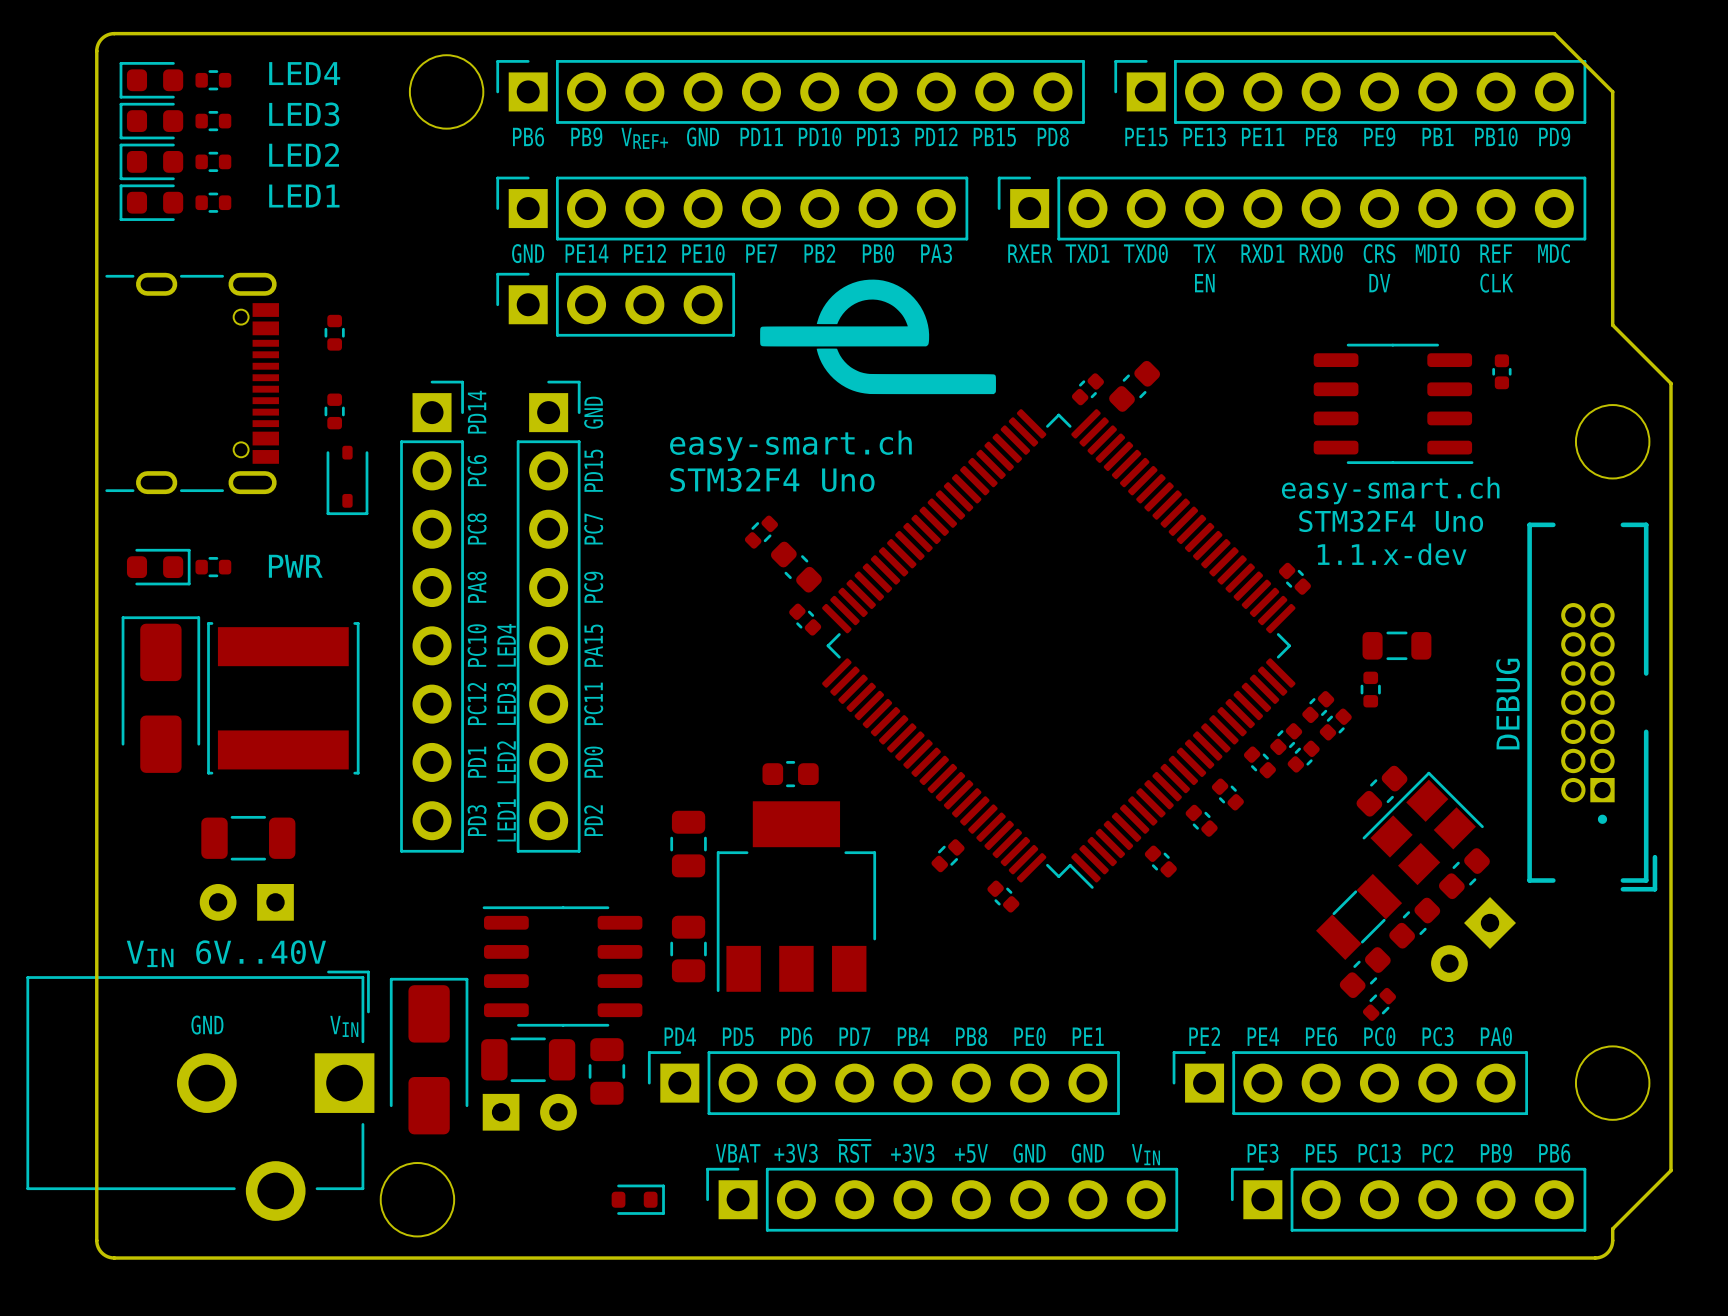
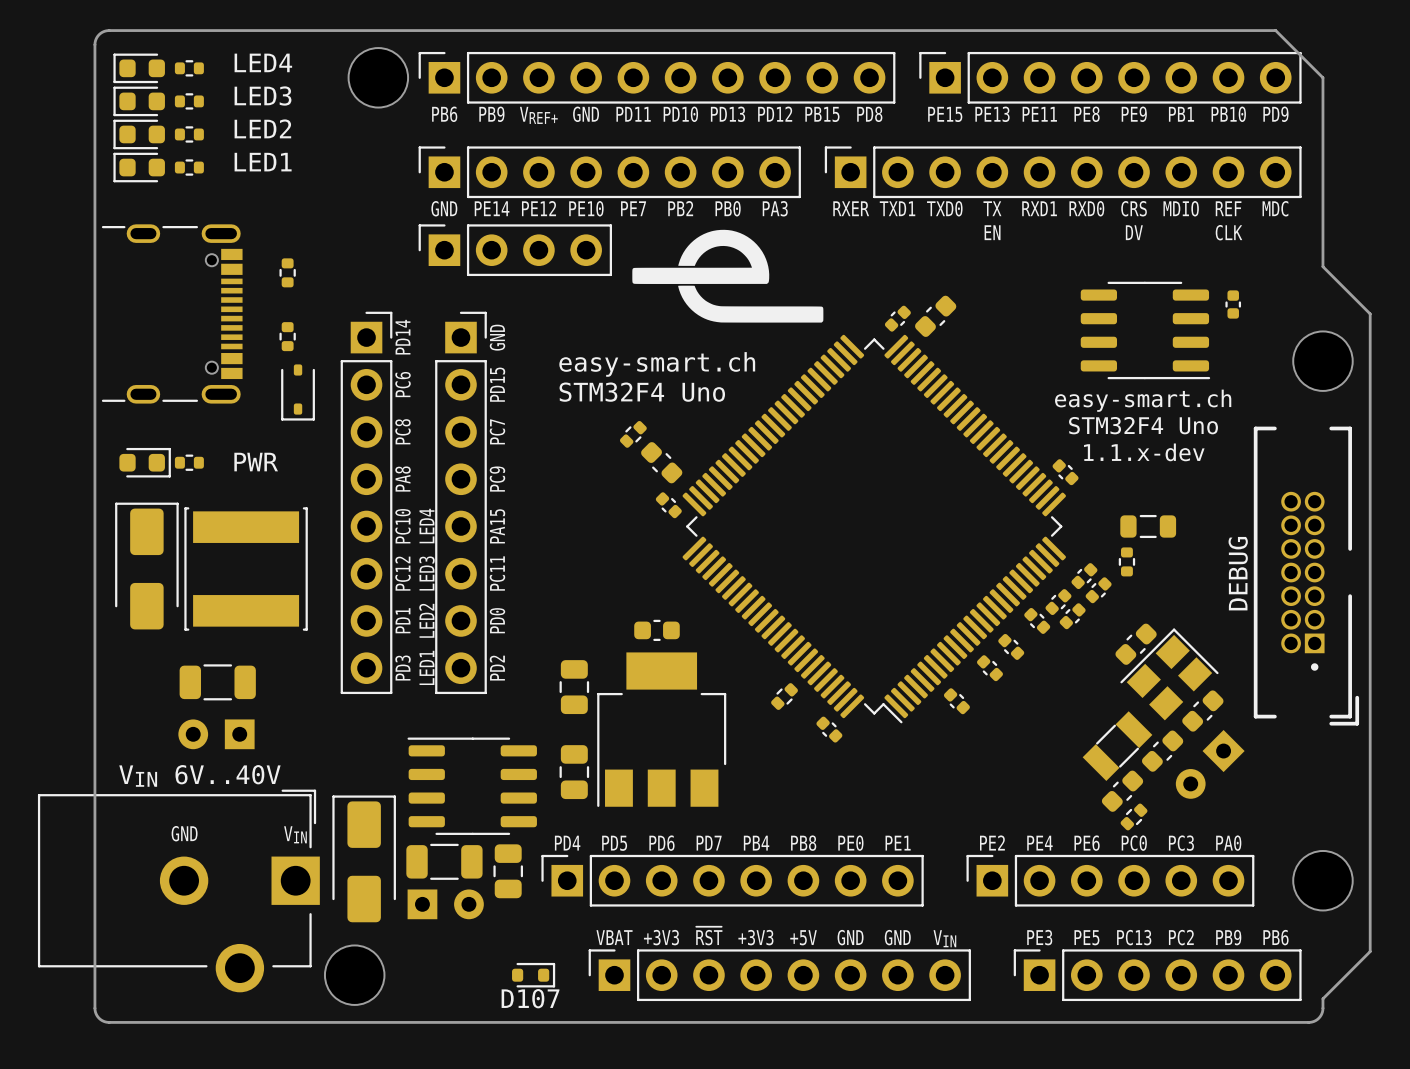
D107 name: none -> D107 (530, 998)

